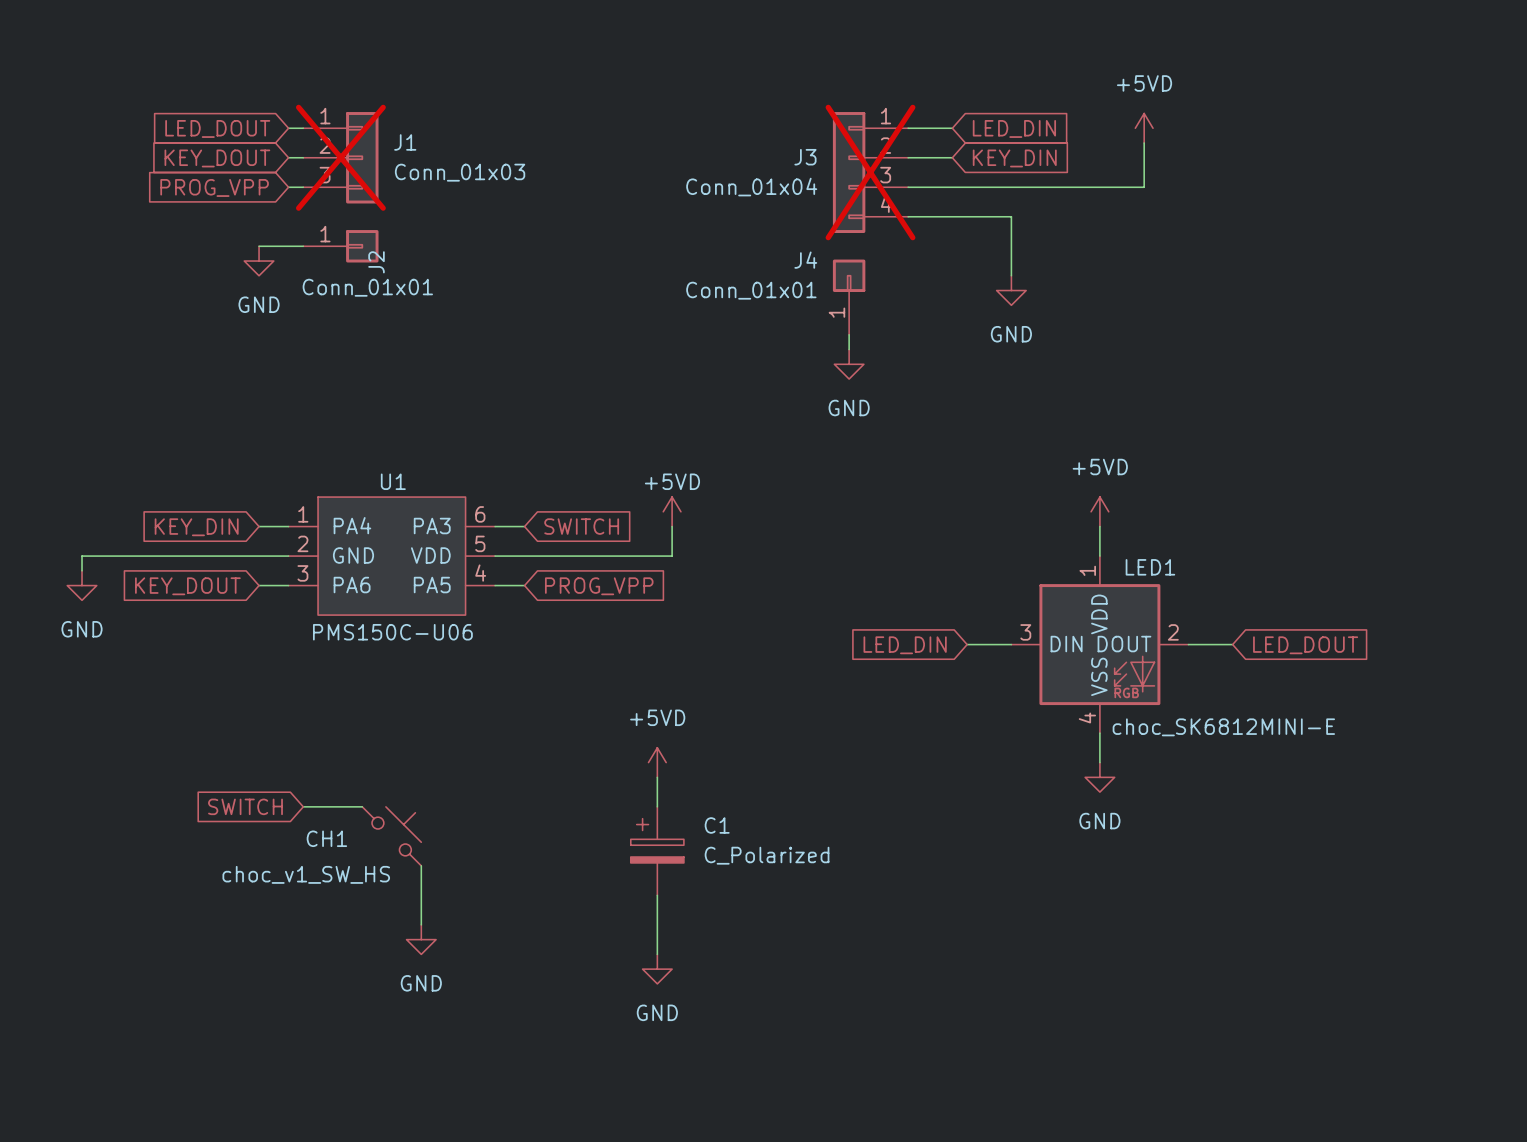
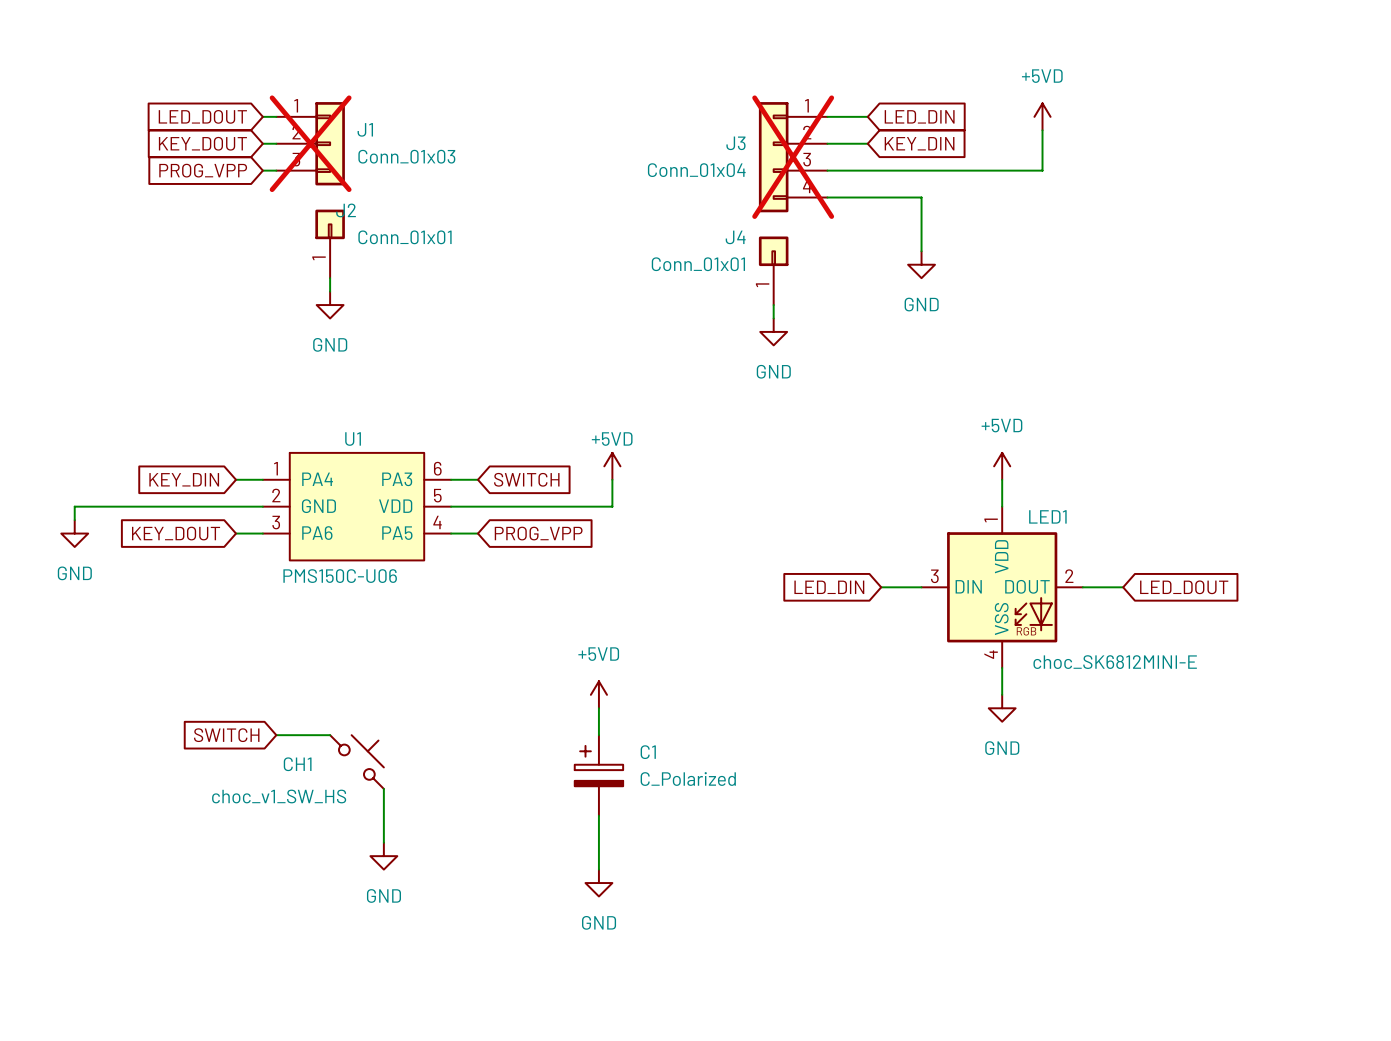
wire: (259, 246) (303, 246) -> none
J2 rotation: 0° (362, 246) -> 90° counterclockwise (330, 224)
power symbol position: GND (259, 261) -> GND (330, 305)
J2 value position: Conn_01x01 (367, 287) -> Conn_01x01 (405, 237)
wire: none -> (330, 278) (330, 291)

